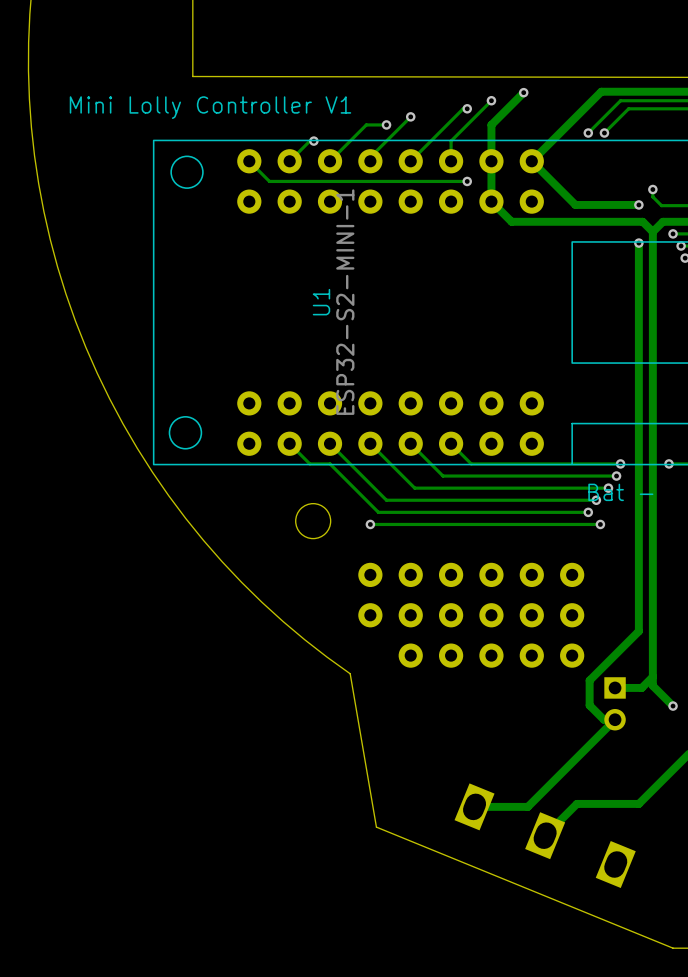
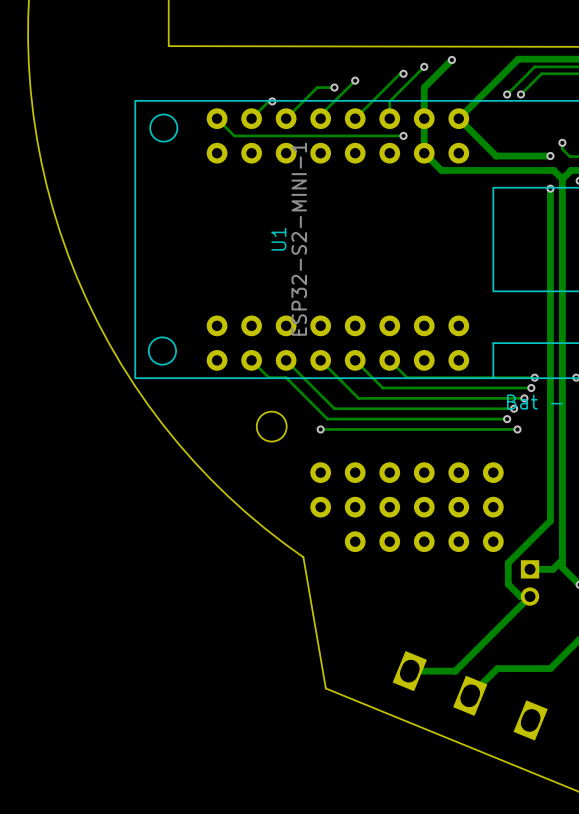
text: Mini Lolly Controller V1 (210, 107) -> none

